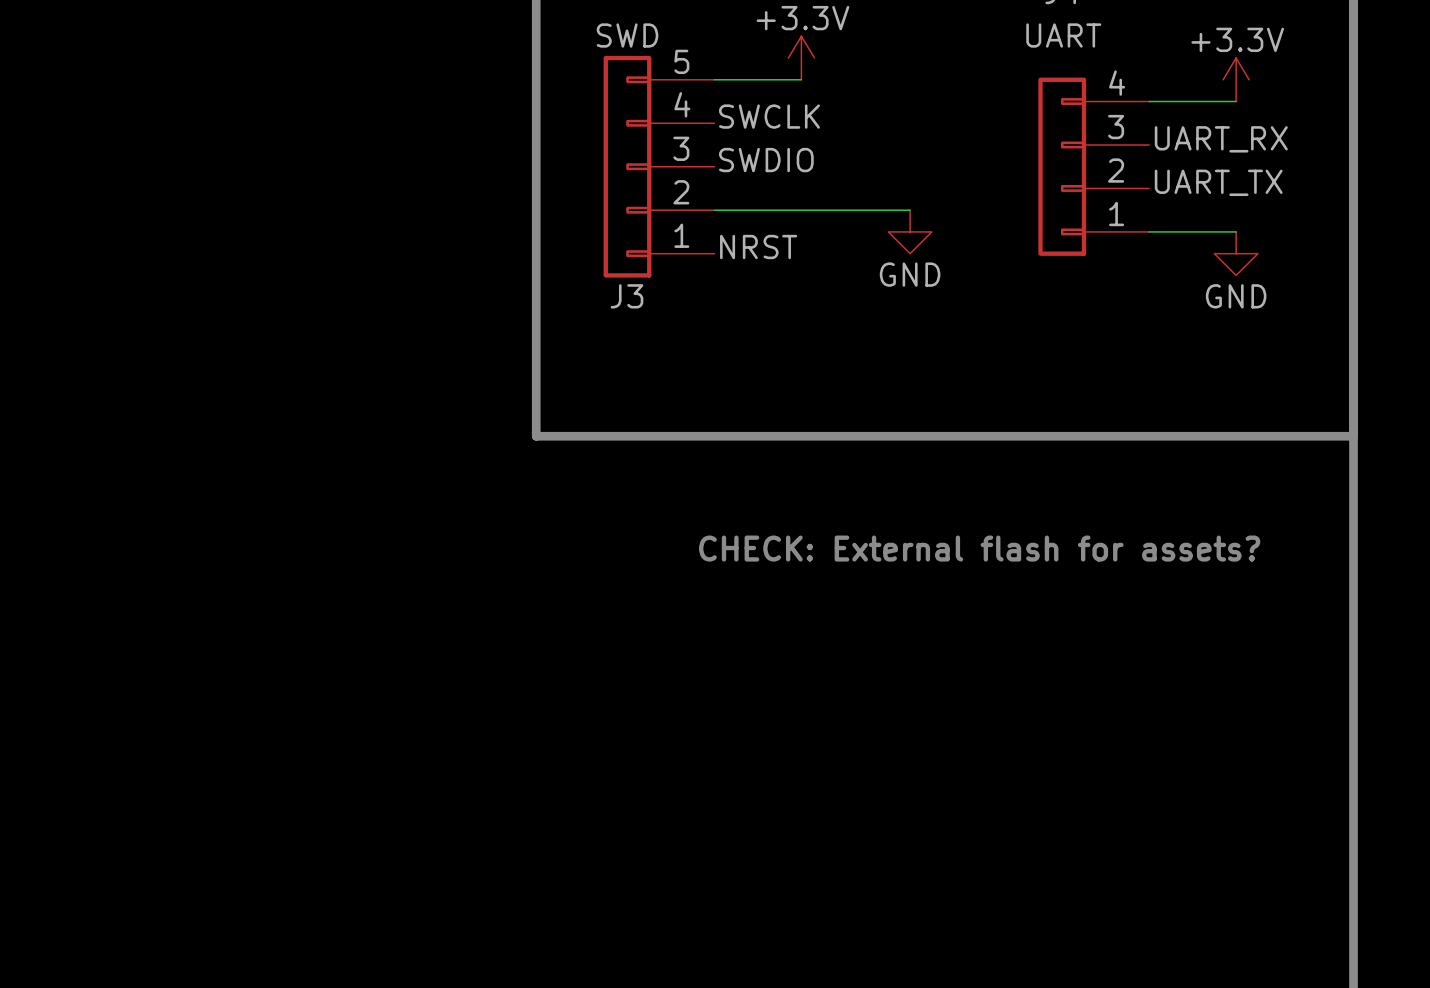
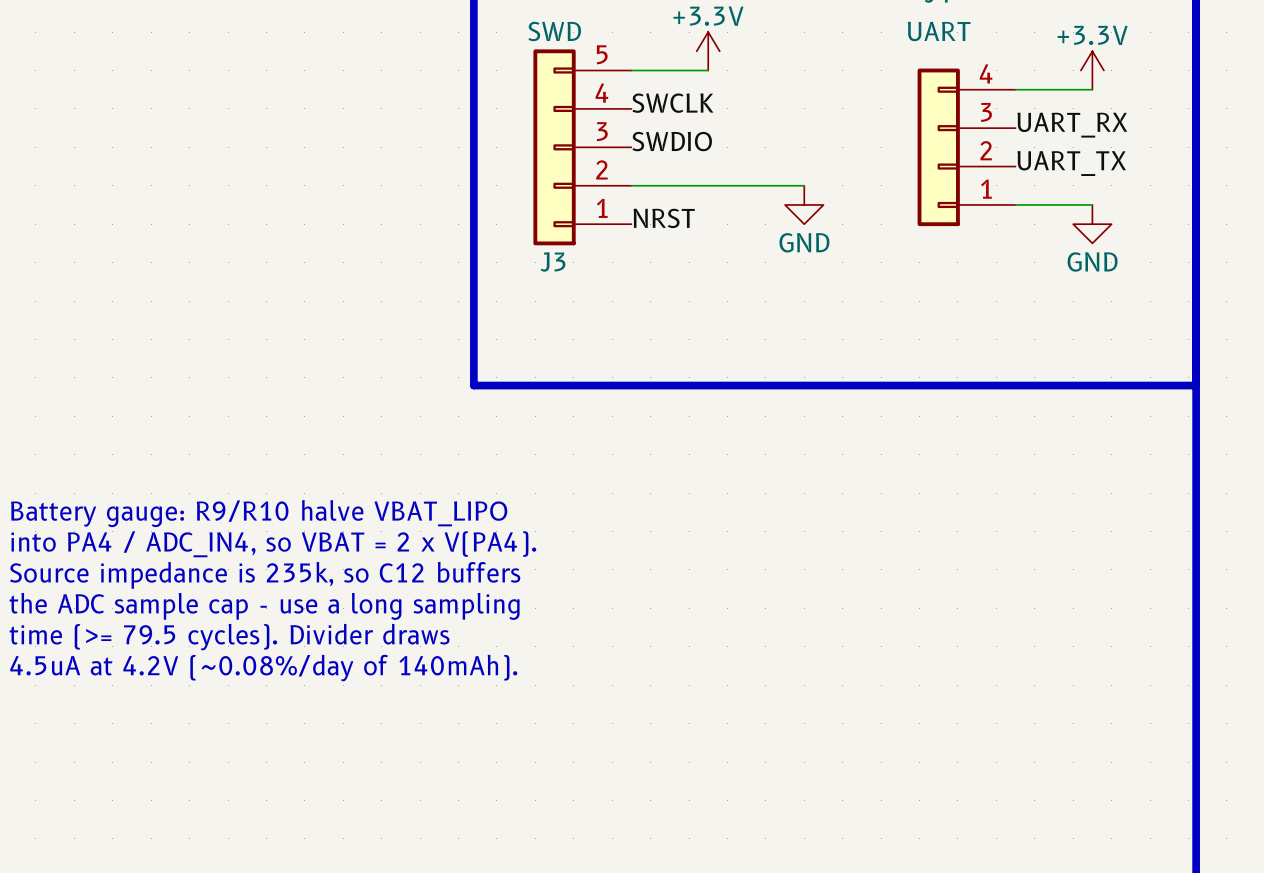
text: CHECK: External flash for assets? (979, 548) -> none
text: none -> Battery gauge: R9/R10 halve VBAT_LIPO (259, 513)
text: none -> into PA4 / ADC_IN4, so VBAT = 2 x V(PA4). (273, 544)
text: none -> Source impedance is 235k, so C12 buffers (265, 575)
text: none -> the ADC sample cap - use a long sampling (264, 606)
text: none -> time (>= 79.5 cycles). Divider draws (229, 637)
text: none -> 4.5uA at 4.2V (~0.08%/day of 140mAh). (263, 668)

